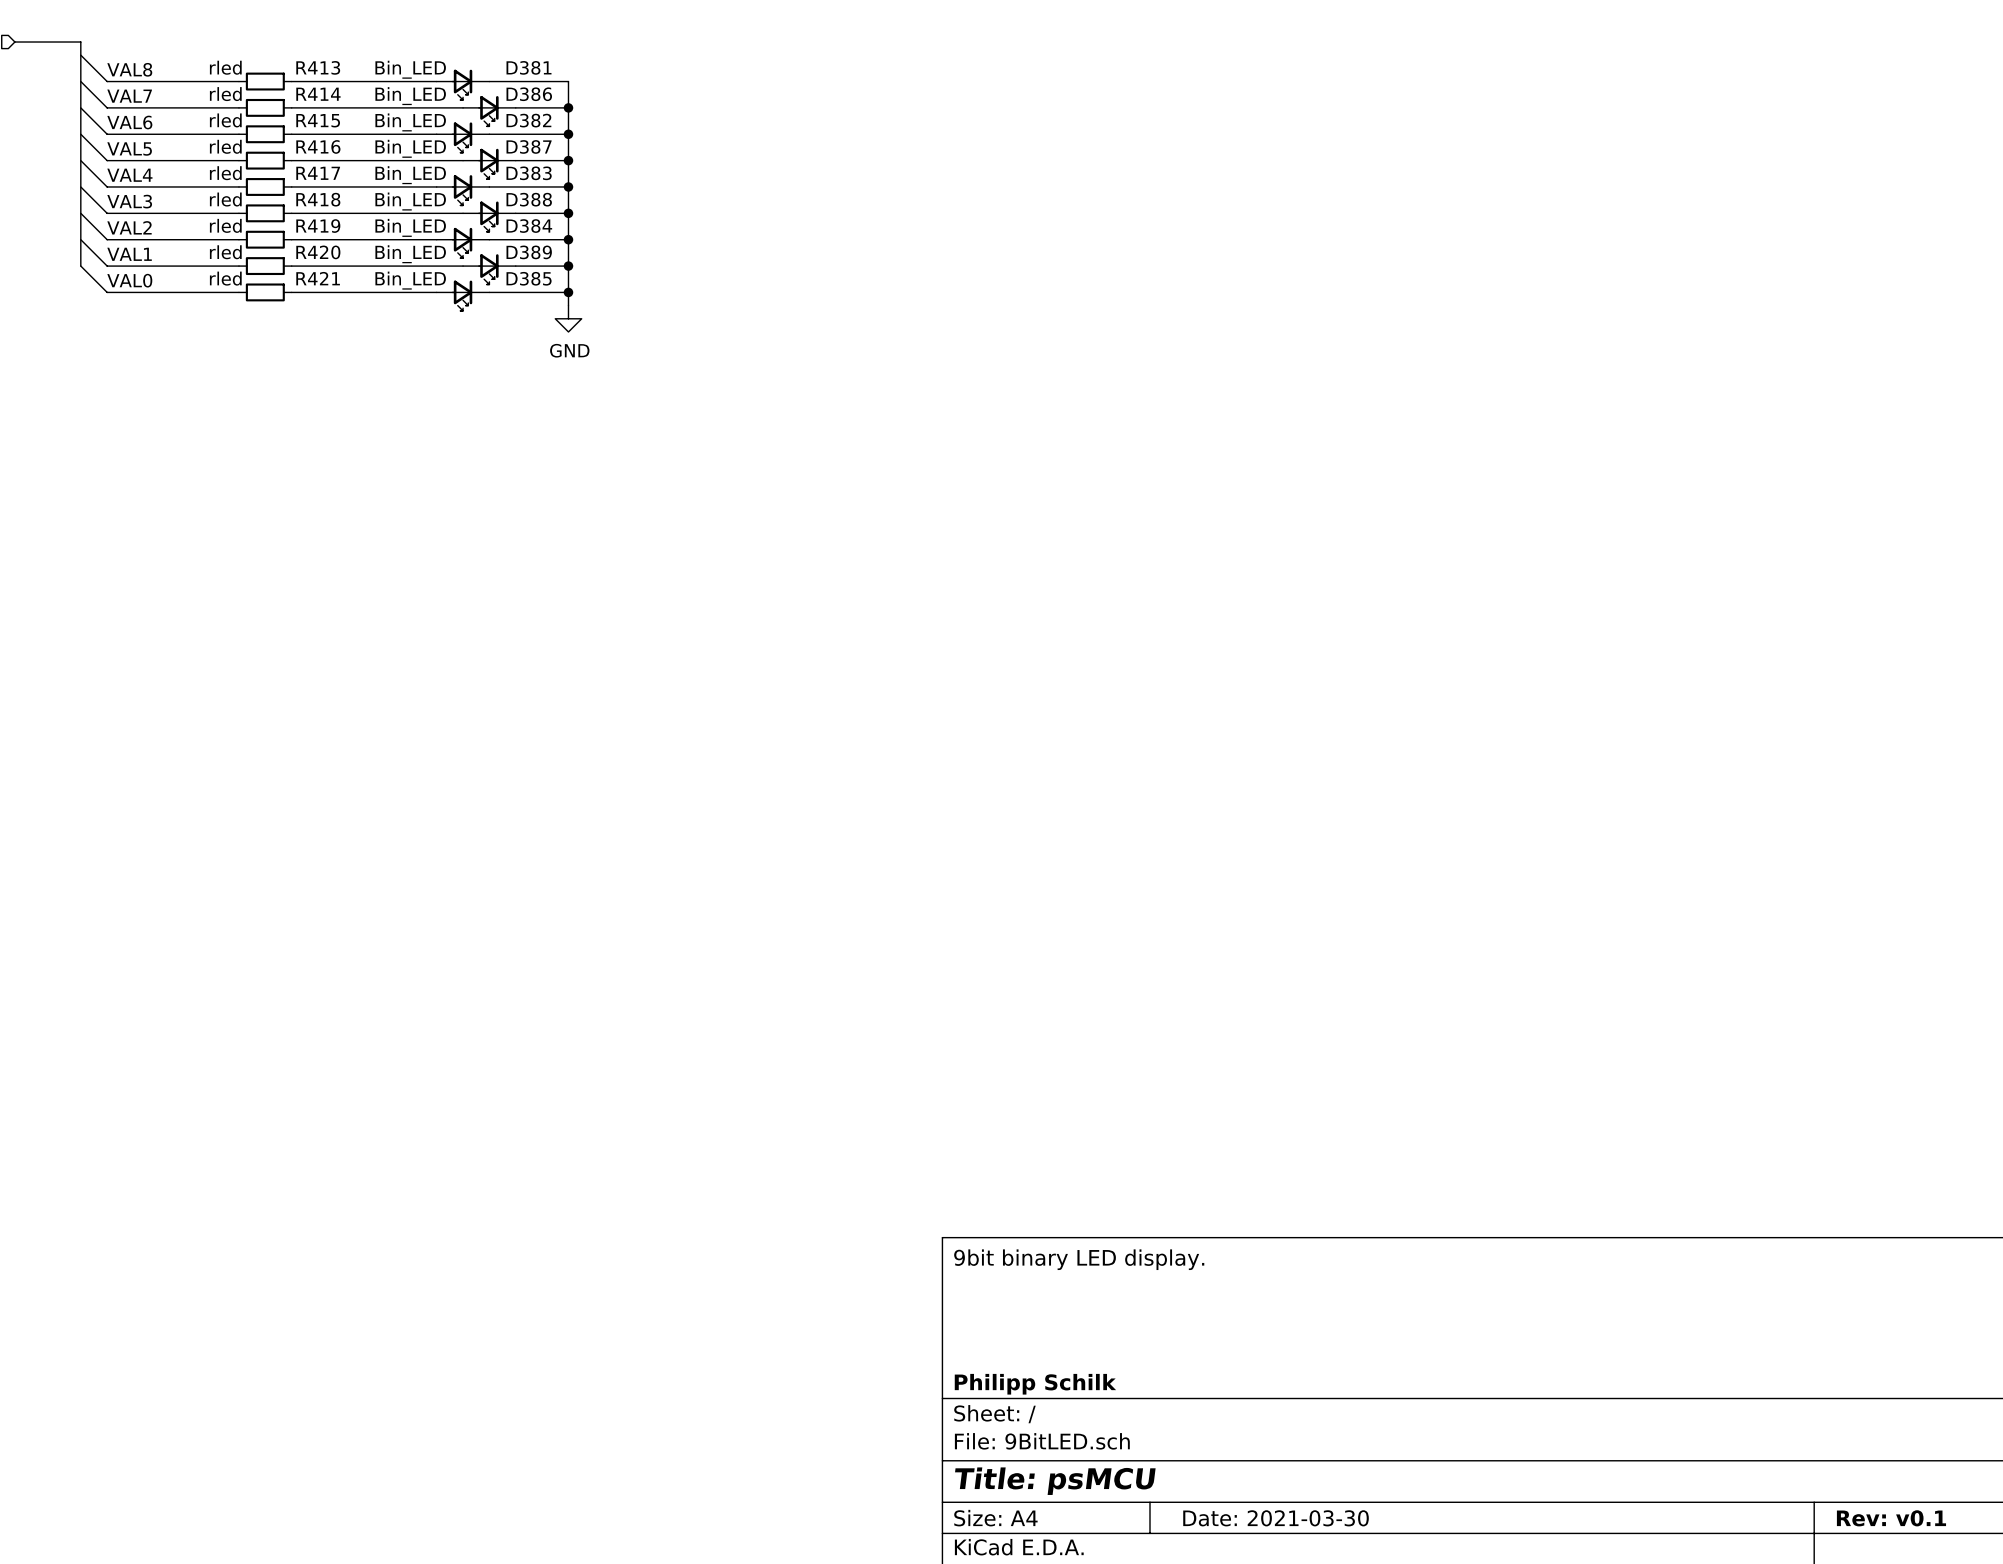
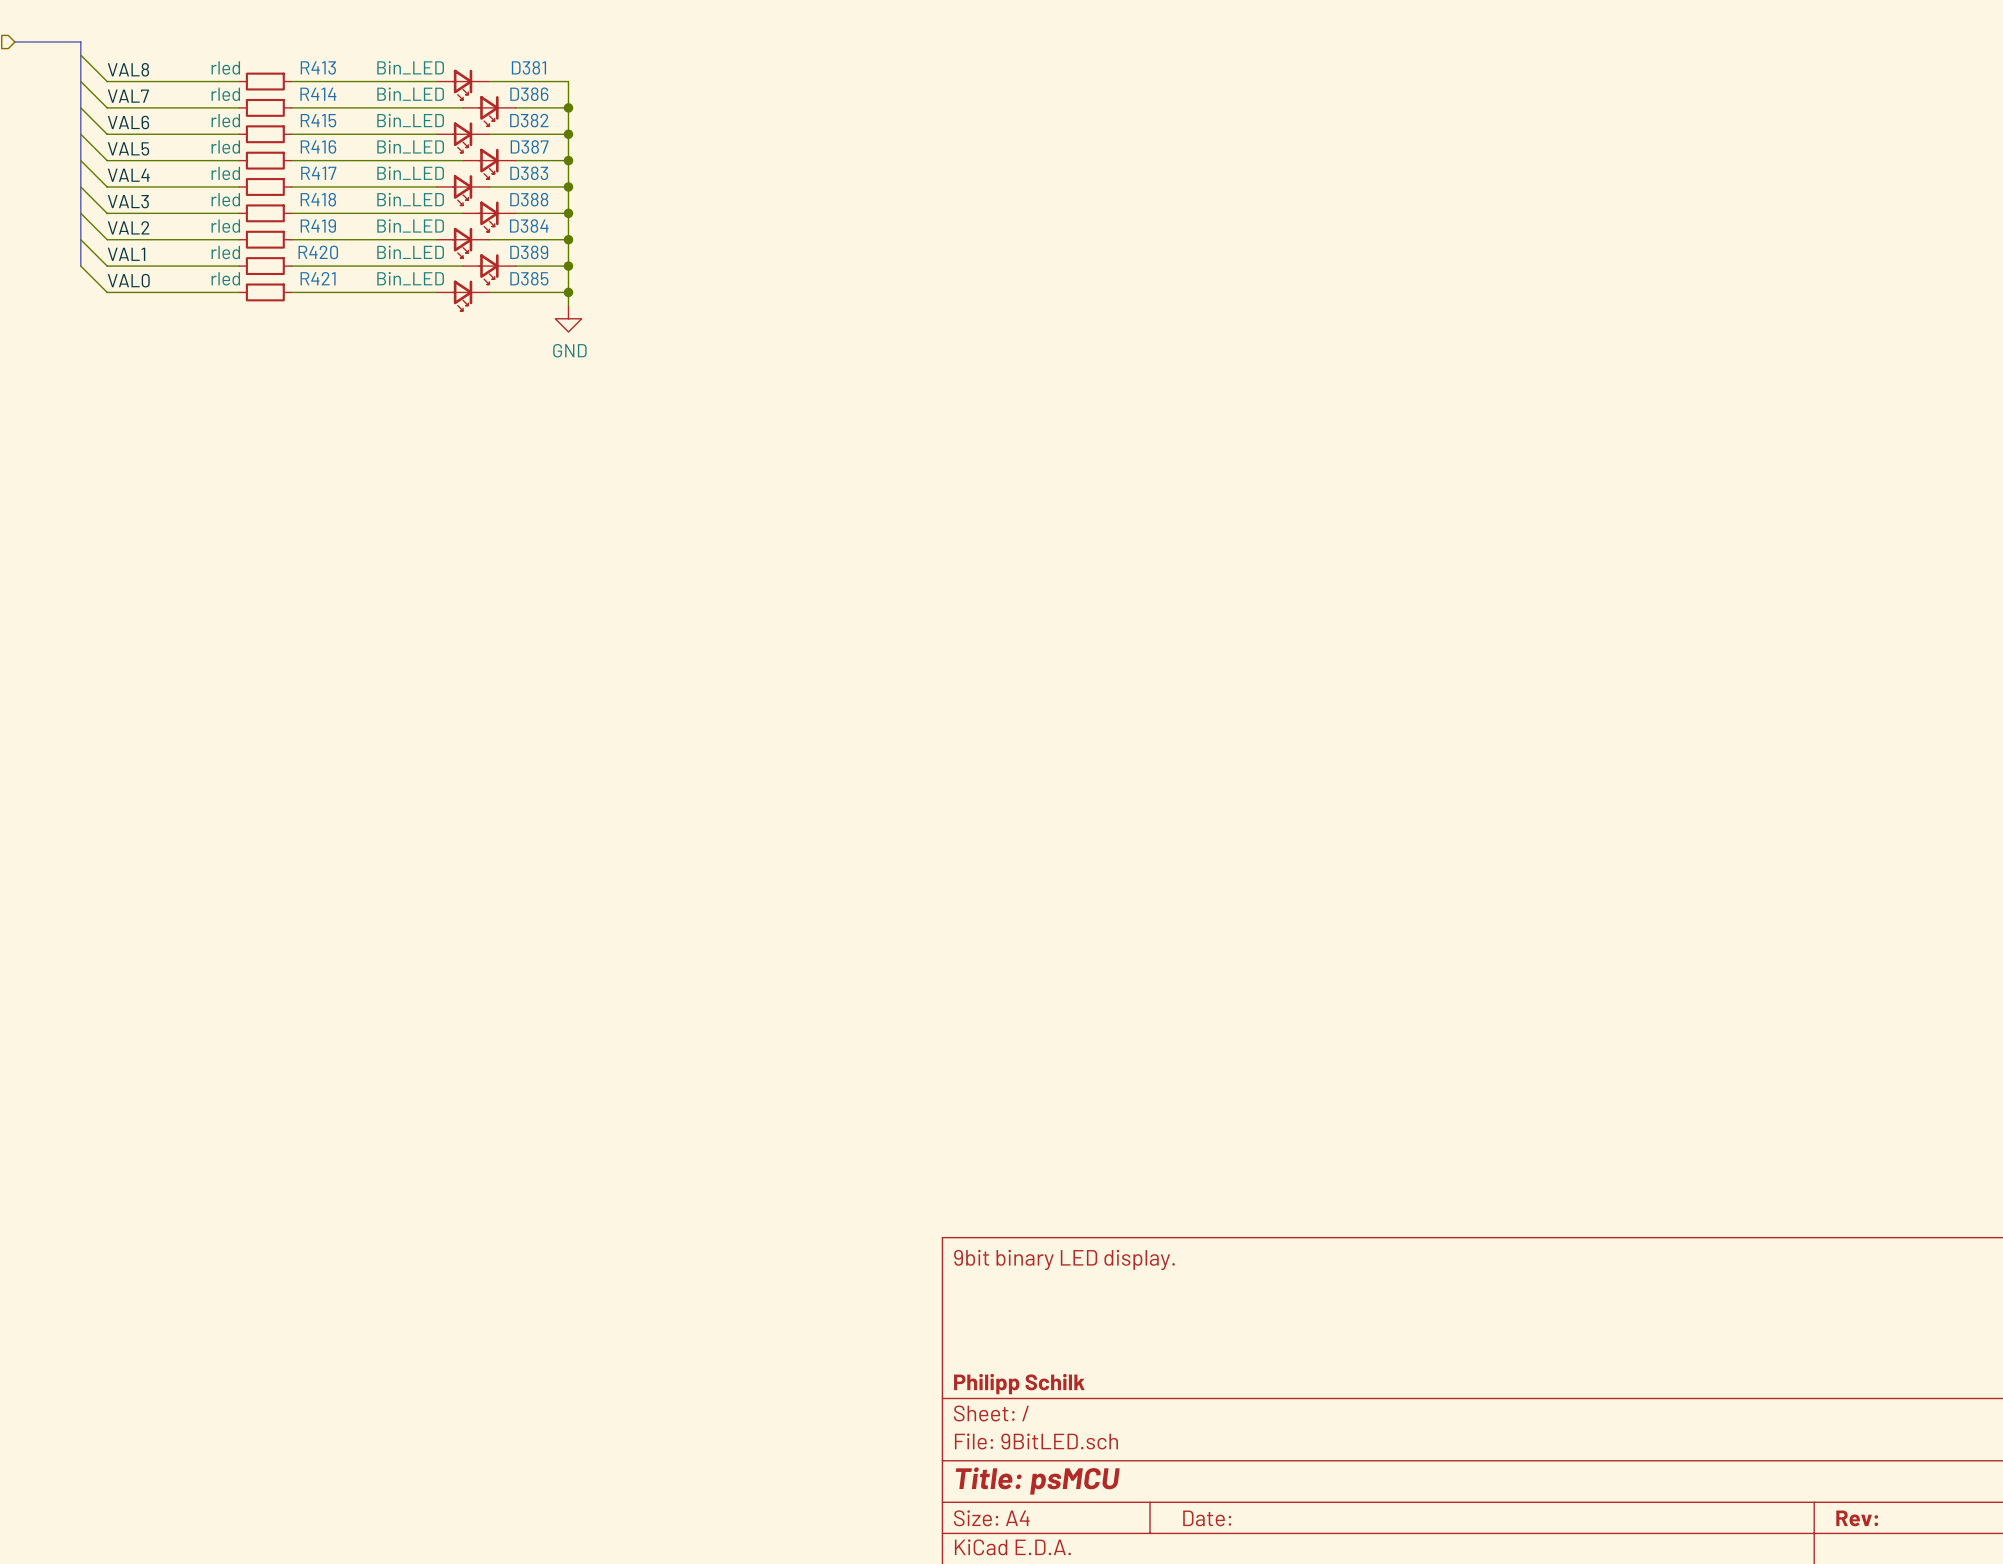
title block: Date: 2021-03-30 (1276, 1518) -> Date: (1207, 1518)
title block: Rev: v0.1 (1891, 1518) -> Rev: (1857, 1518)

